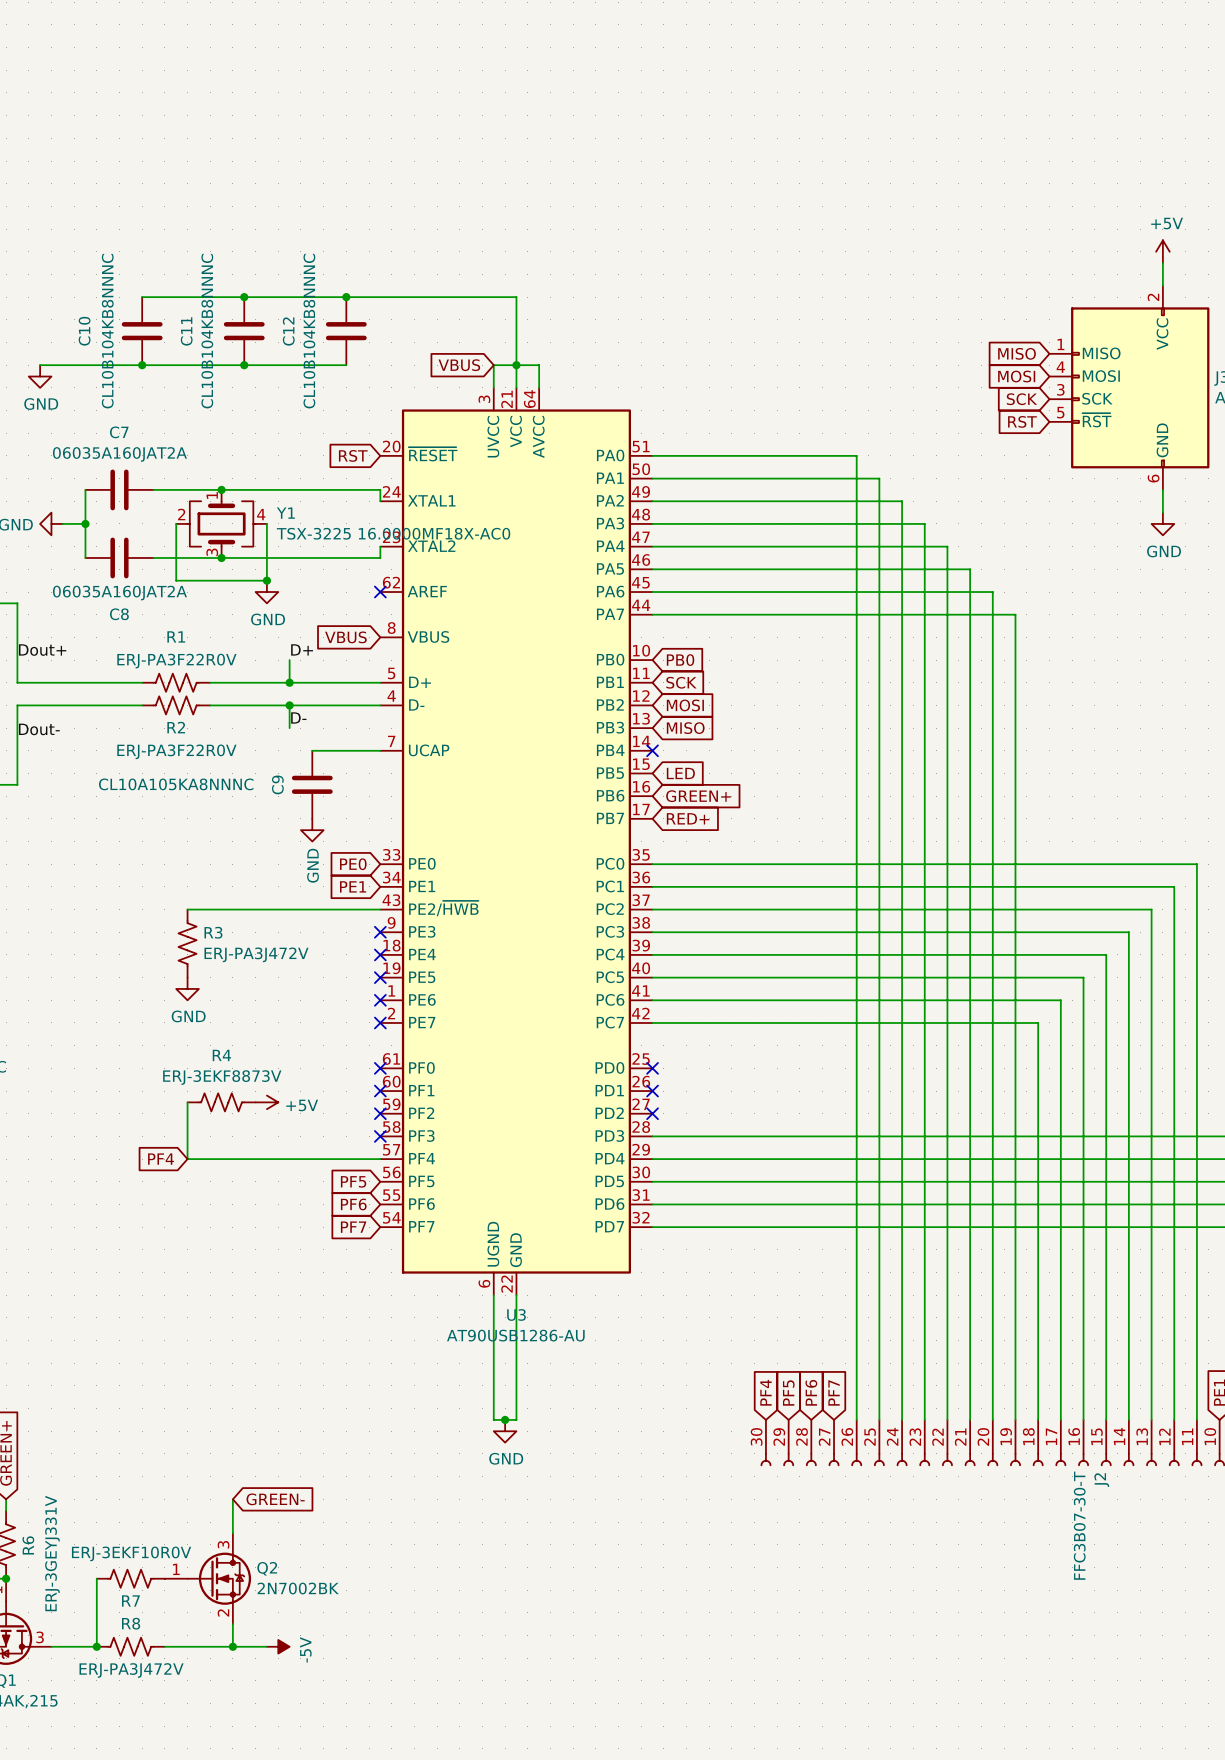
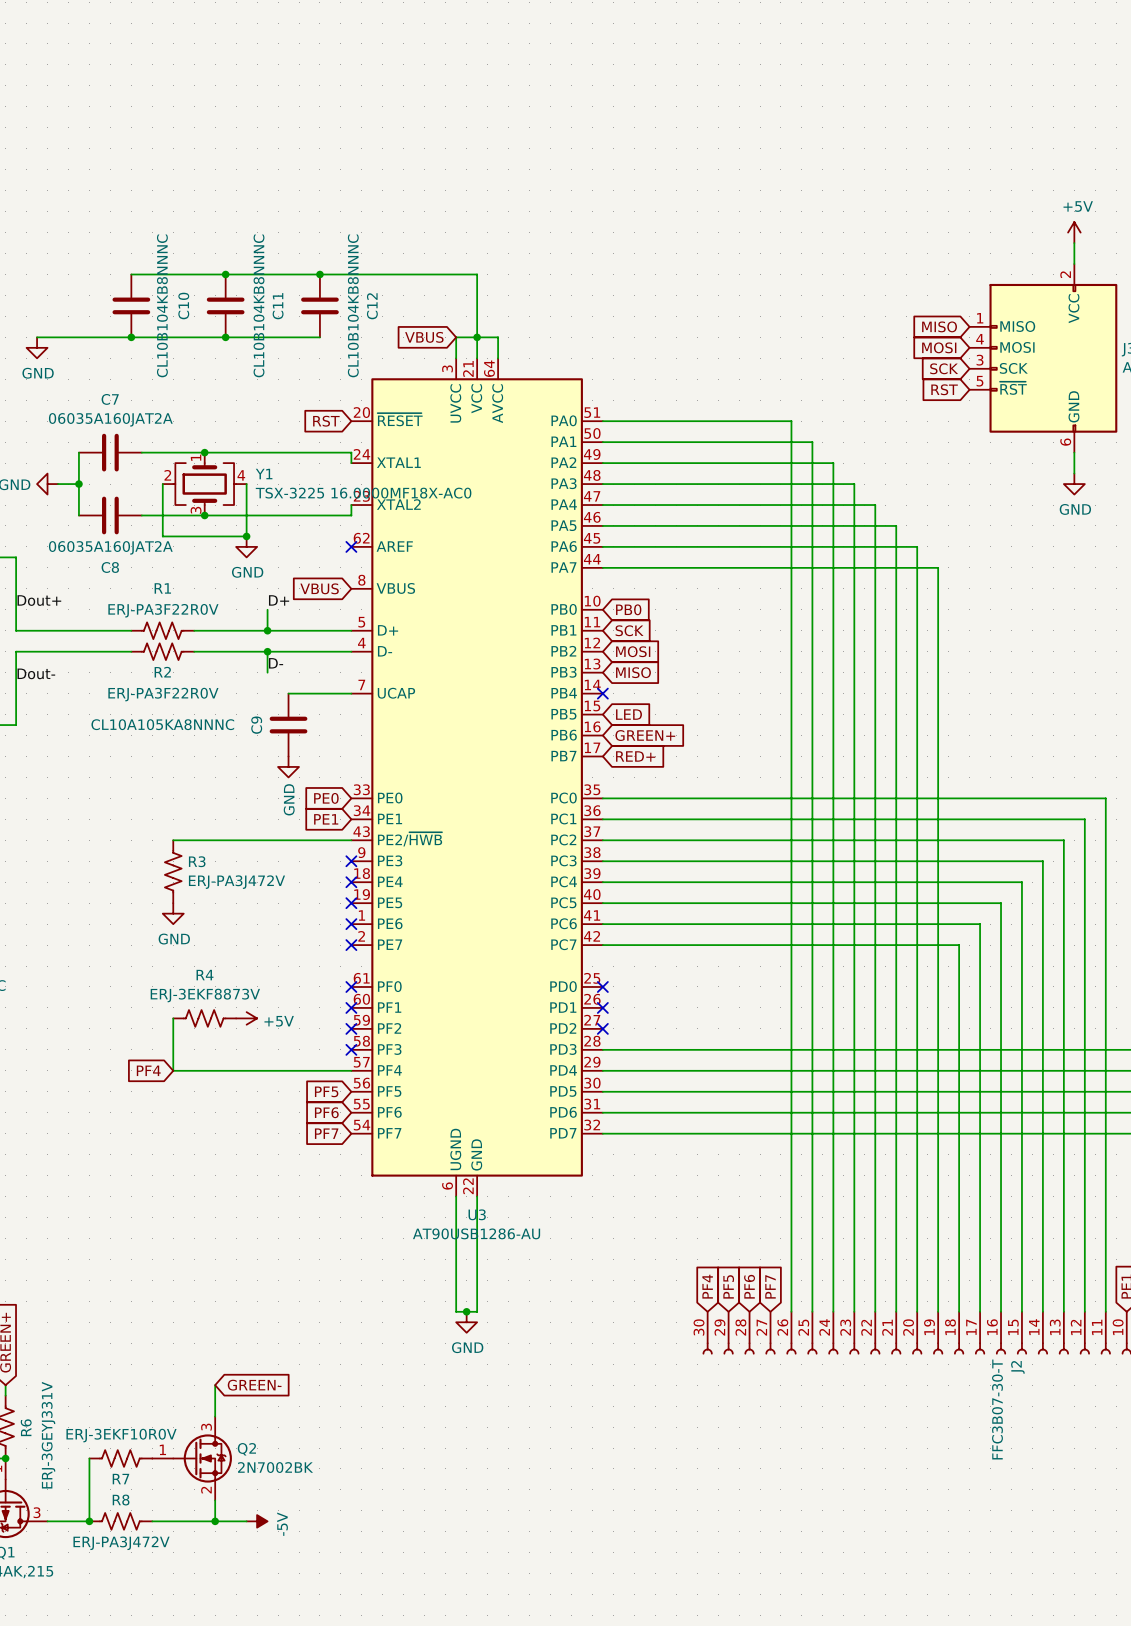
C10 name position: C10 (84, 331) -> C10 (183, 306)
C10 value position: CL10B104KB8NNNC (107, 331) -> CL10B104KB8NNNC (162, 305)
C11 name position: C11 (186, 331) -> C11 (278, 306)
C11 value position: CL10B104KB8NNNC (207, 331) -> CL10B104KB8NNNC (259, 305)
C12 name position: C12 (288, 331) -> C12 (372, 306)
C12 value position: CL10B104KB8NNNC (309, 331) -> CL10B104KB8NNNC (353, 305)

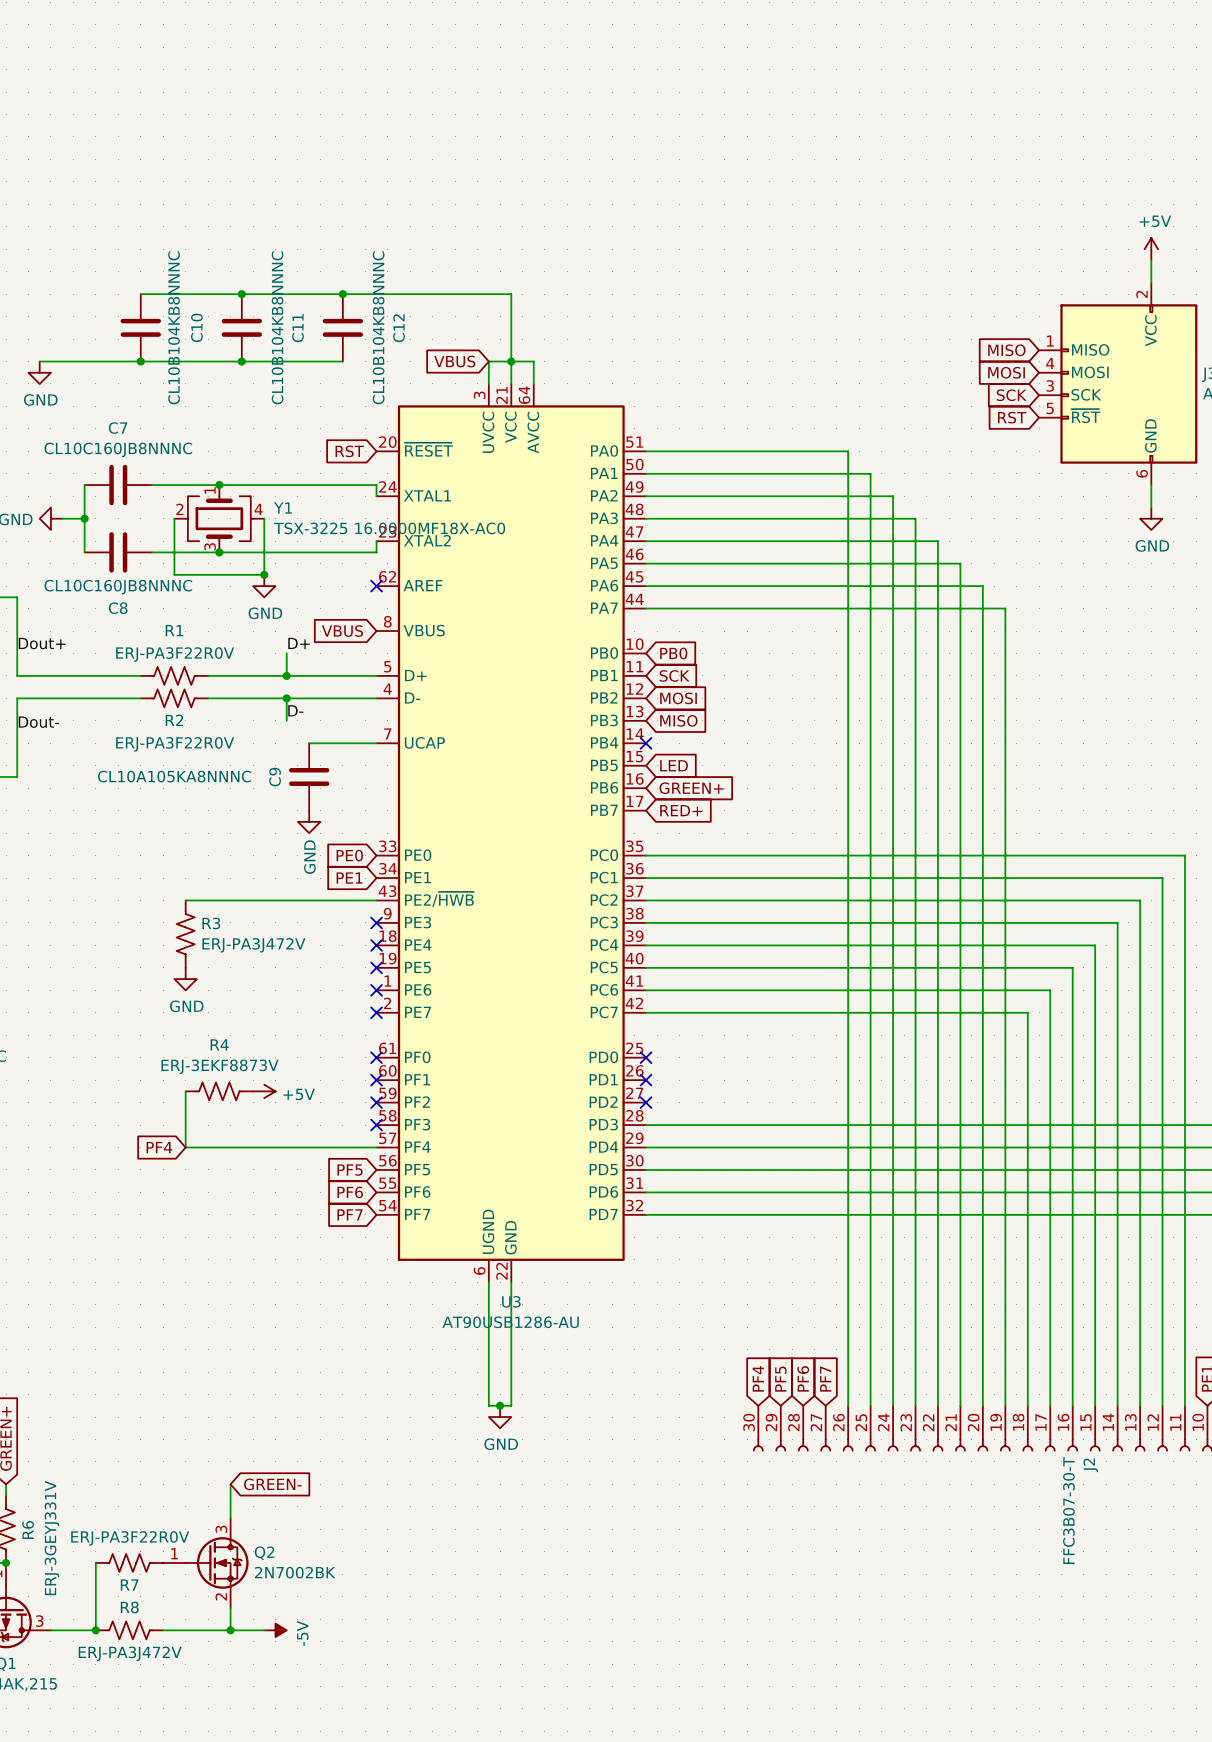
C7 value: 06035A160JAT2A (110, 419) -> CL10C160JB8NNNC (118, 449)
C8 value: 06035A160JAT2A (110, 547) -> CL10C160JB8NNNC (118, 587)
R7 value: ERJ-3EKF10R0V (121, 1435) -> ERJ-PA3F22R0V (130, 1538)

